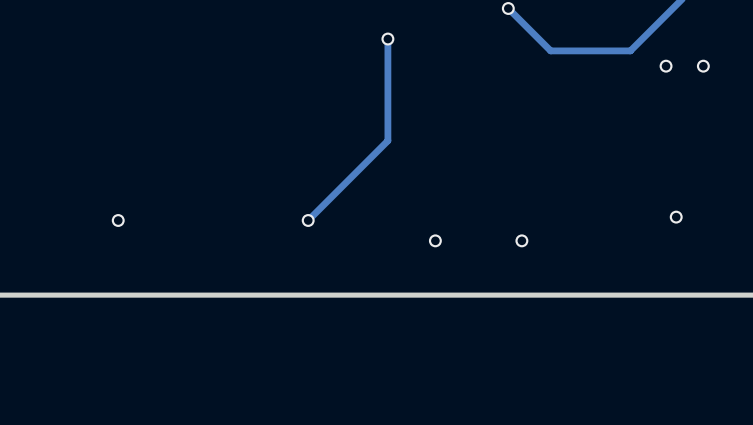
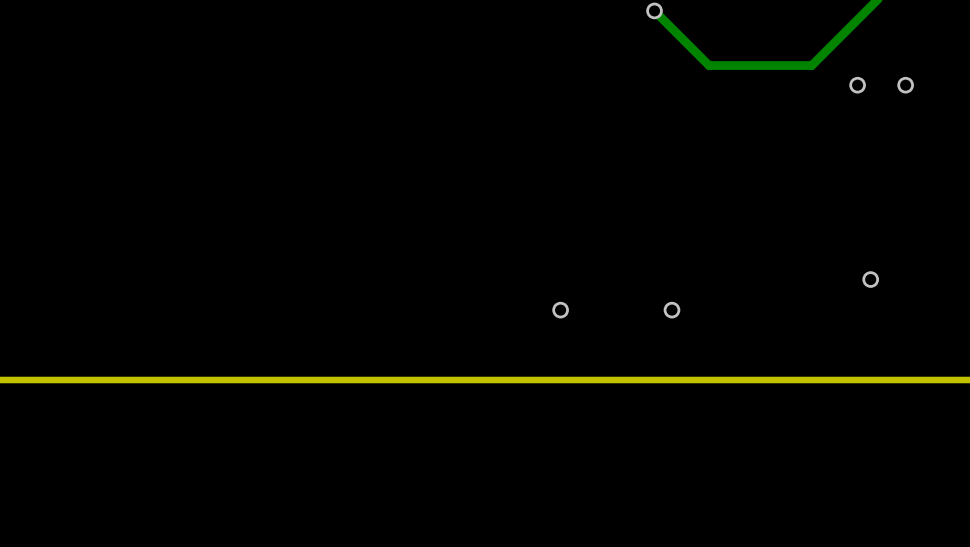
track: (387, 39) (387, 140) (308, 220) -> none
via: (387, 39) -> none
via: (118, 220) -> none
via: (308, 220) -> none

